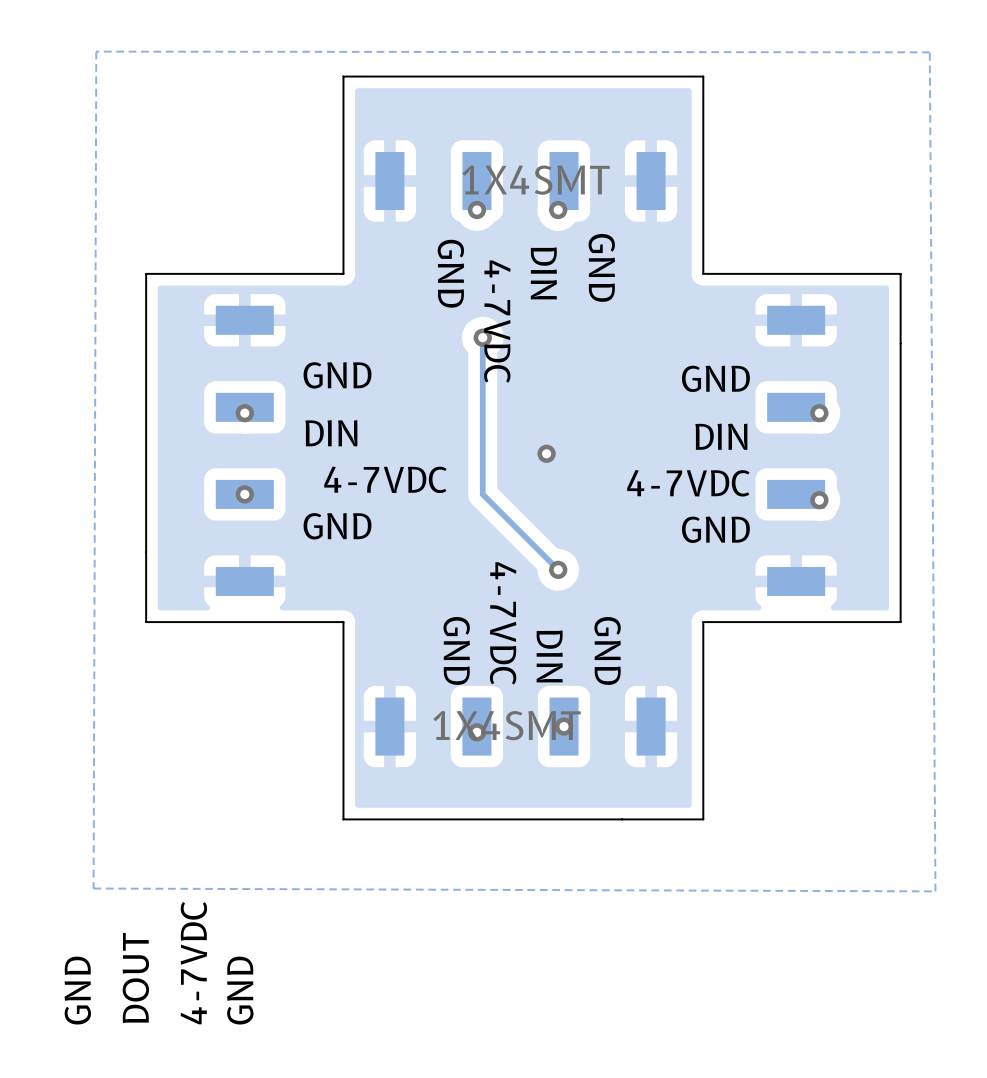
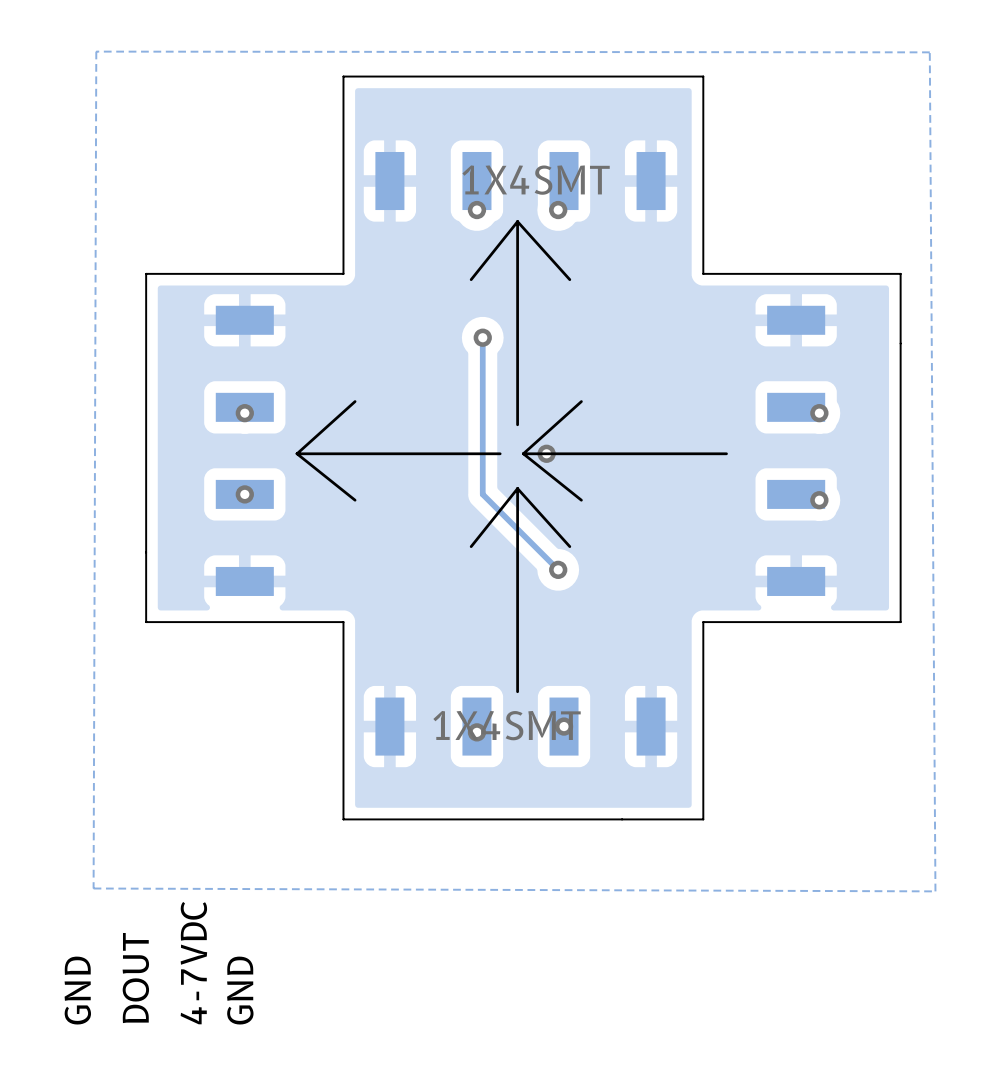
line: none -> (517, 221) (569, 279)
line: none -> (517, 221) (517, 424)
line: none -> (517, 221) (471, 279)
text: GND (601, 267) -> none
text: GND (450, 273) -> none
text: DIN (543, 273) -> none
text: 4-7VDC (497, 321) -> none
text: GND (337, 375) -> none
text: GND (715, 378) -> none
line: none -> (355, 401) (297, 453)
line: none -> (581, 401) (523, 453)
text: DIN (331, 433) -> none
text: DIN (721, 436) -> none
line: none -> (297, 453) (355, 500)
line: none -> (500, 453) (297, 453)
line: none -> (523, 453) (581, 500)
line: none -> (726, 453) (523, 453)
text: 4-7VDC (385, 479) -> none
text: 4-7VDC (688, 483) -> none
line: none -> (517, 488) (569, 546)
line: none -> (517, 488) (471, 546)
line: none -> (517, 488) (517, 691)
text: GND (337, 526) -> none
text: GND (715, 529) -> none
text: 4-7VDC (503, 623) -> none
text: GND (456, 650) -> none
text: GND (607, 650) -> none
text: DIN (549, 656) -> none

